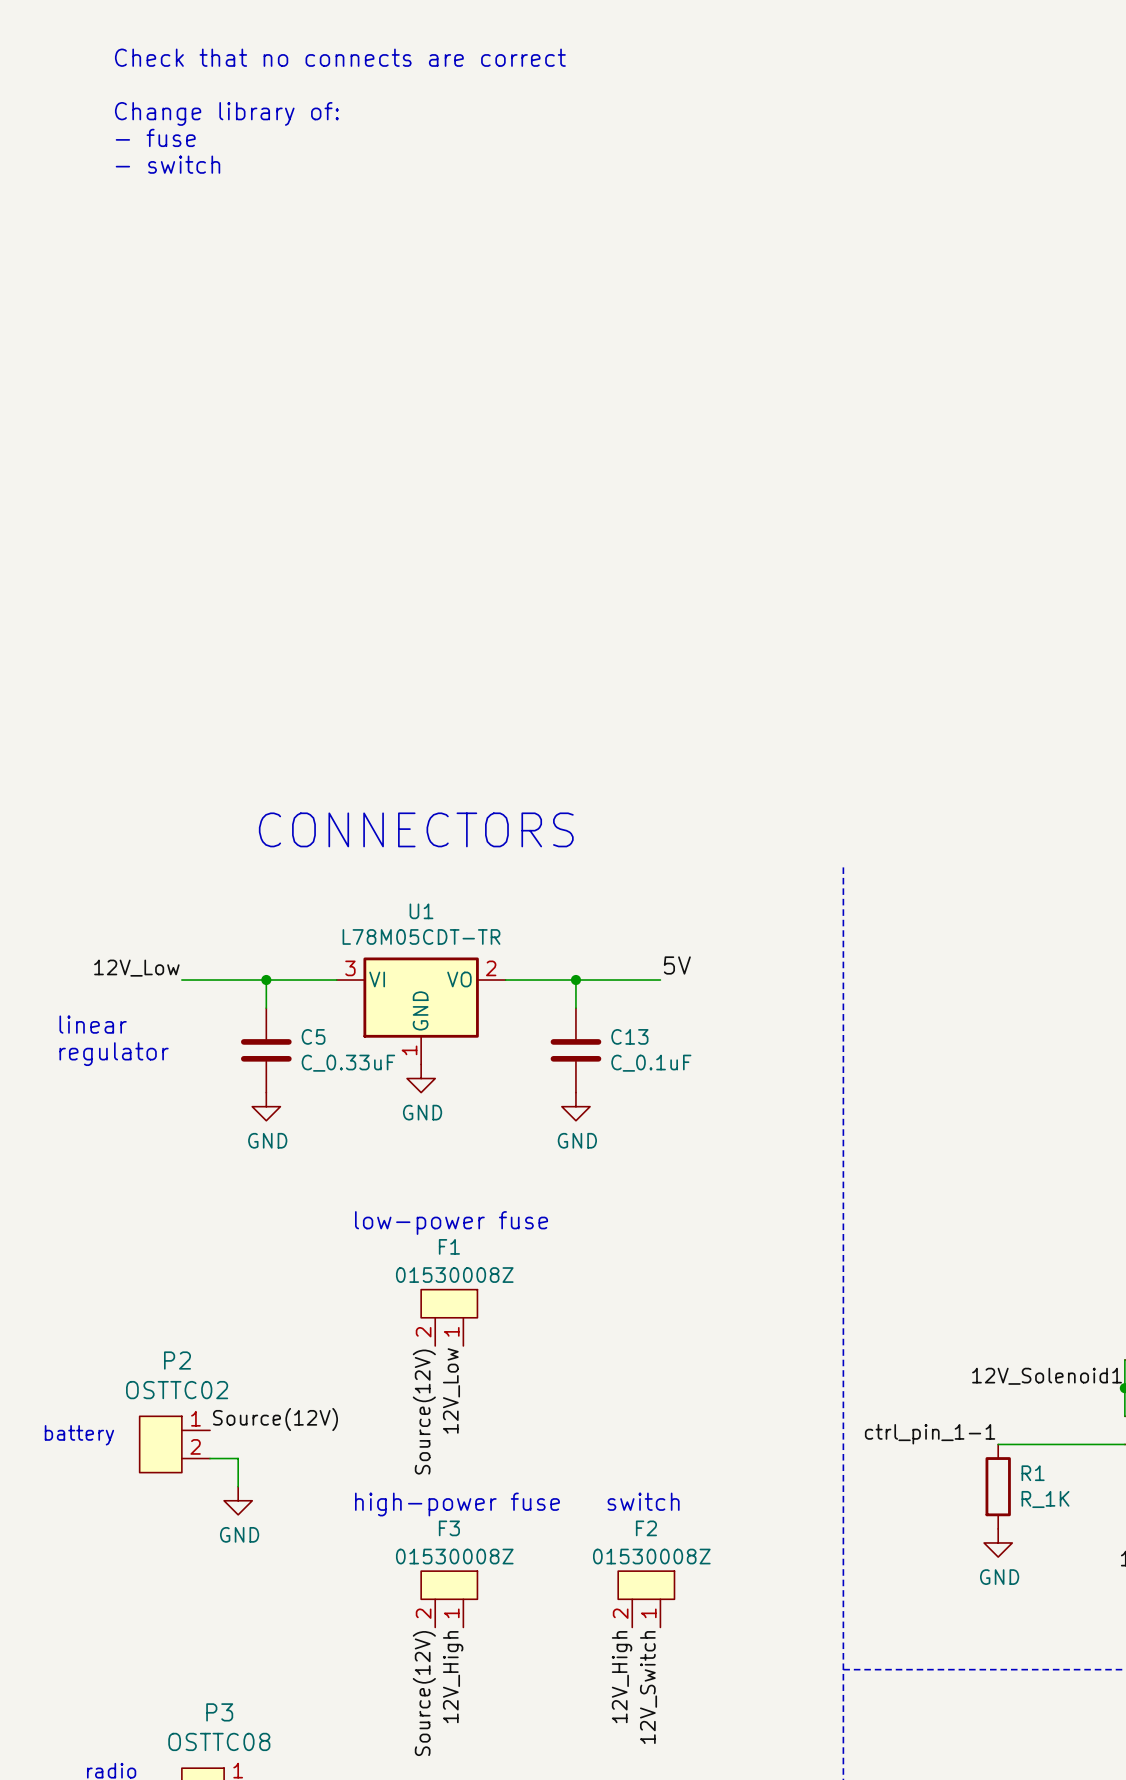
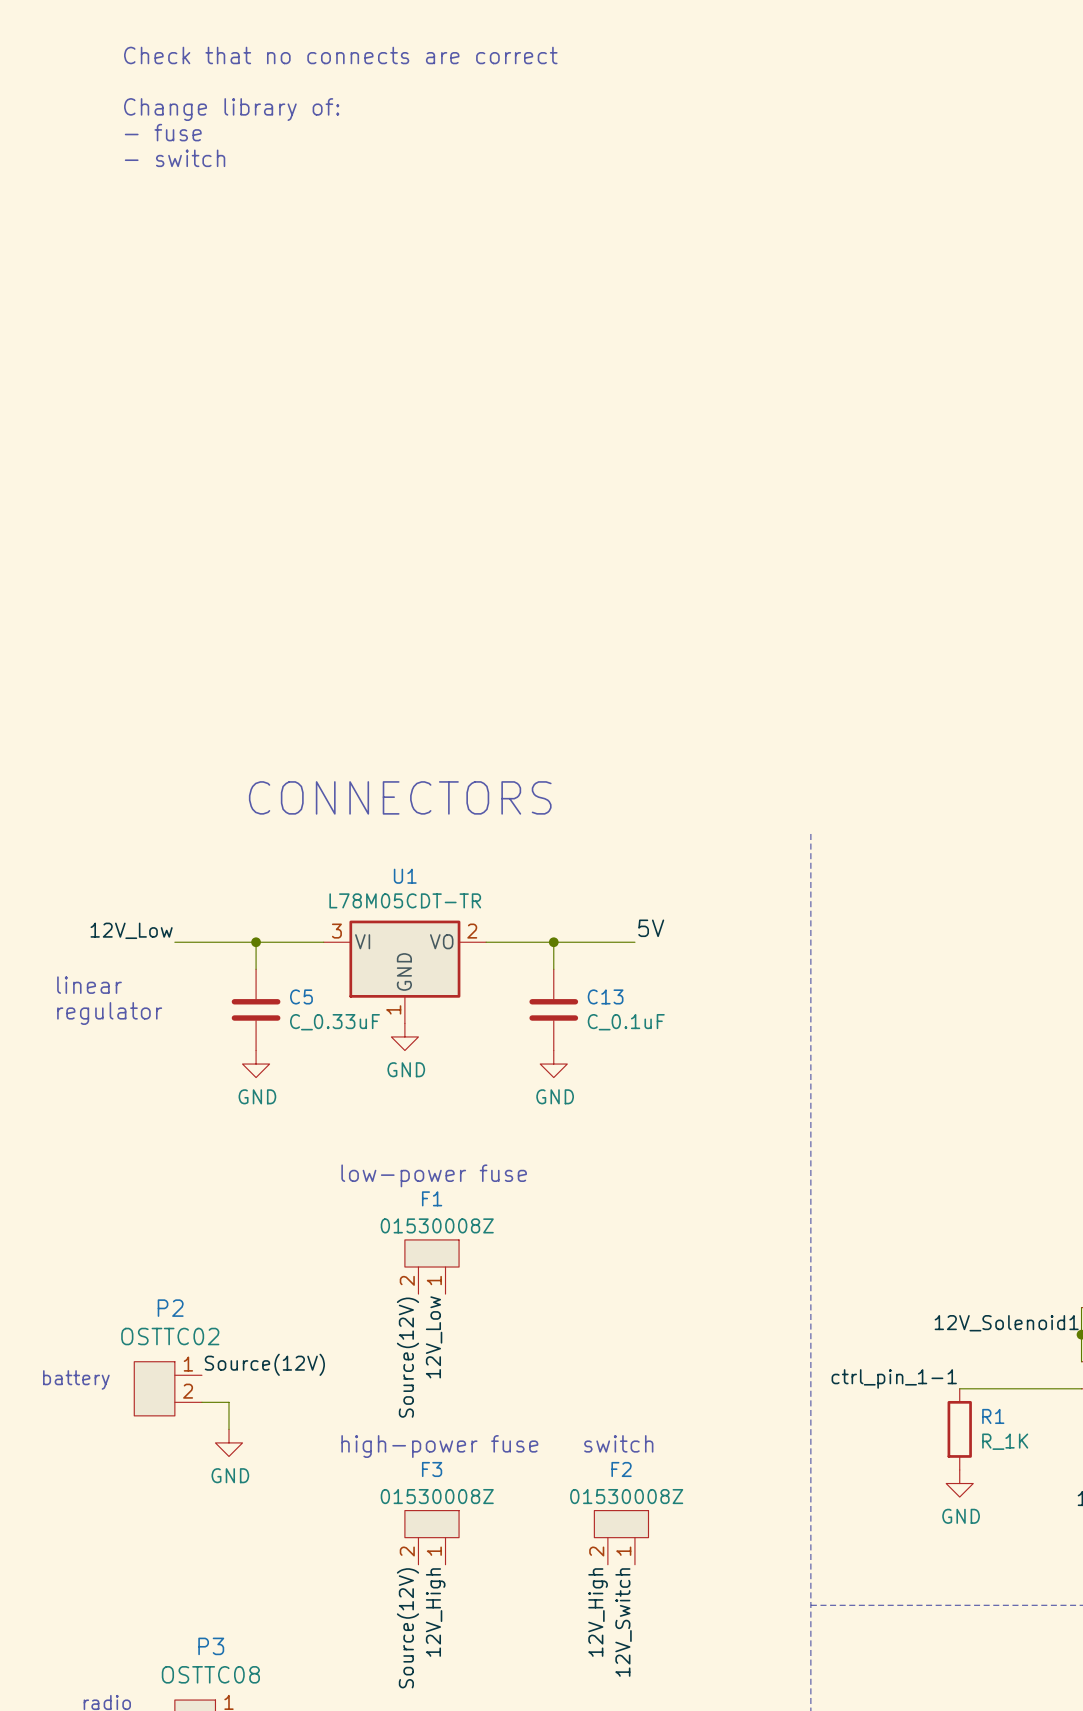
text position: Check that no connects are correct (340, 57) -> Check that no connects are correct (340, 55)
text position: Change library of: (226, 113) -> Change library of: (231, 109)
text position: - fuse (155, 137) -> - fuse (163, 132)
text position: - switch (167, 164) -> - switch (175, 158)

